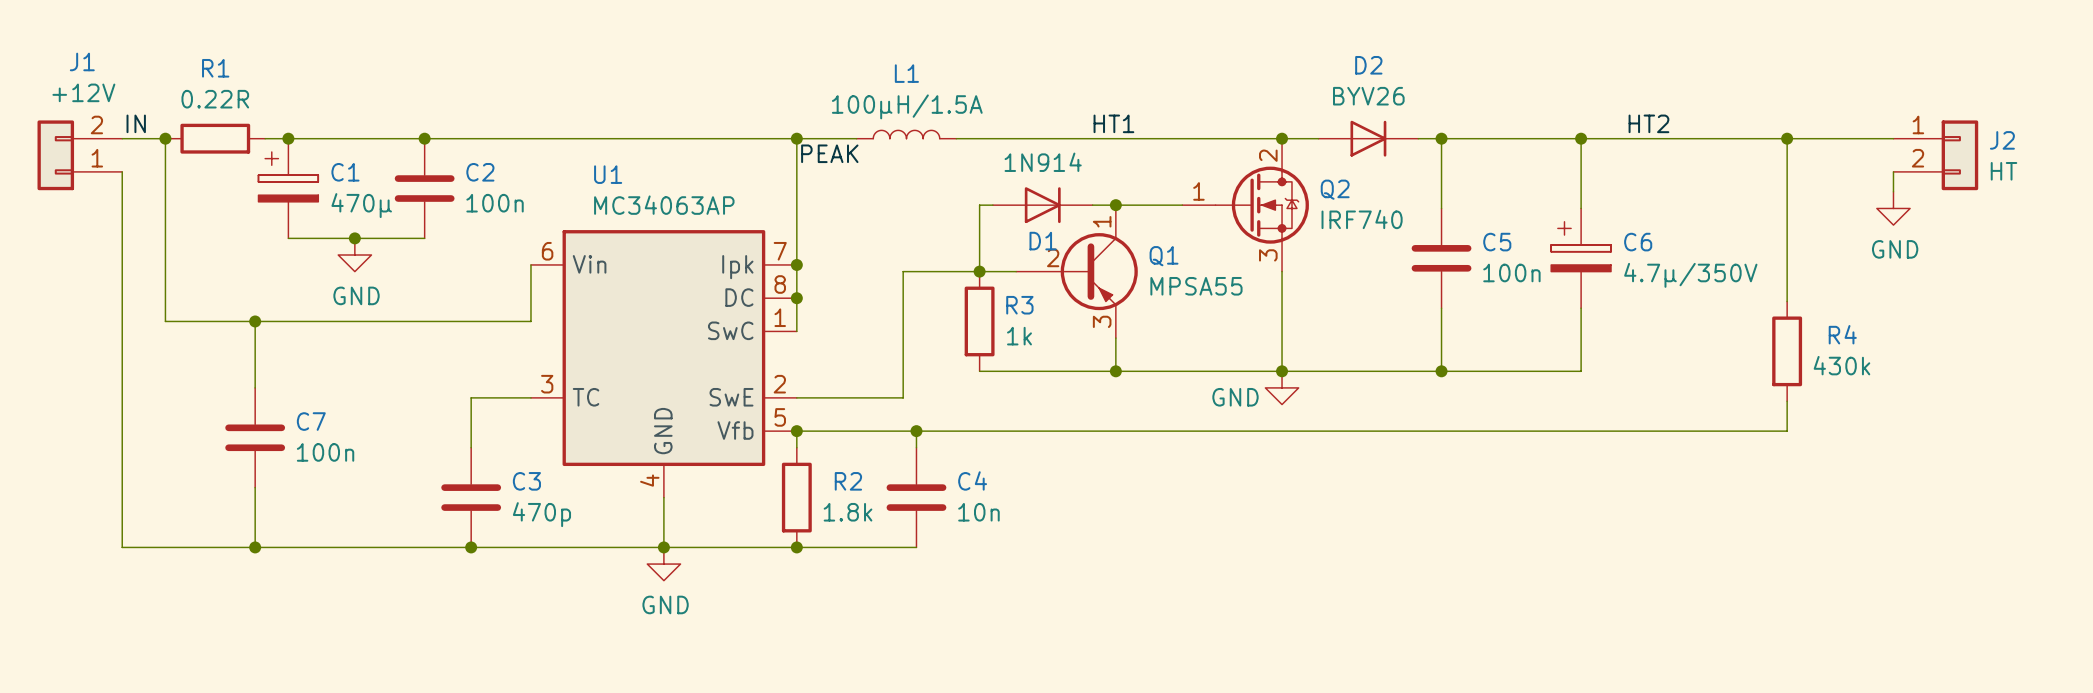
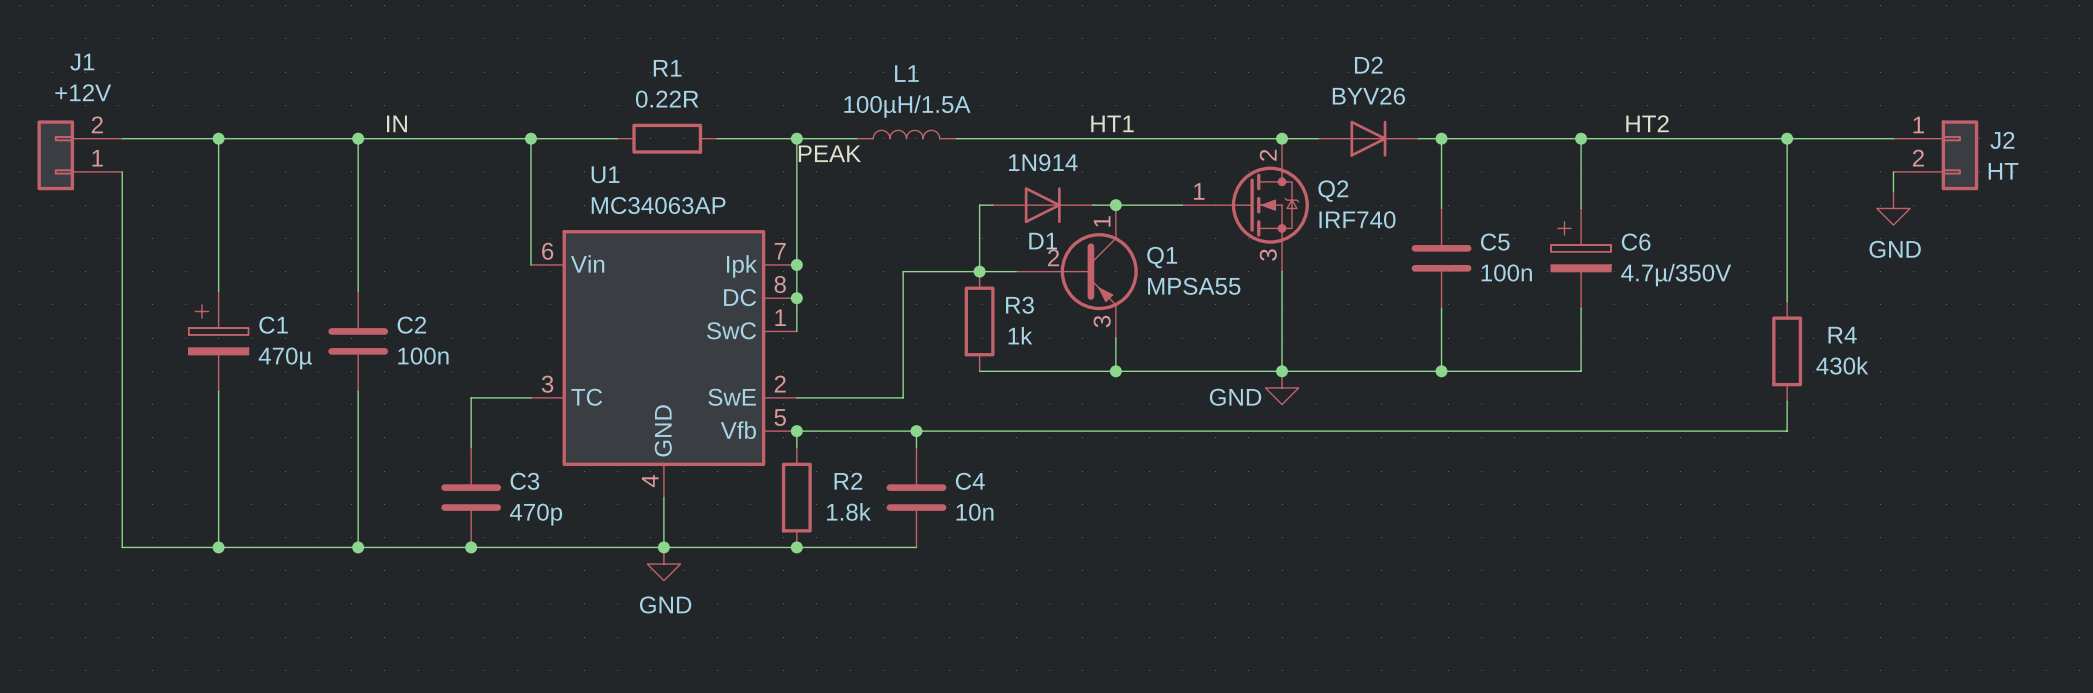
label position: IN (136, 123) -> IN (396, 123)
wire: (165, 138) (165, 321) (530, 321) (530, 264) -> (165, 138) (265, 138)
junction: (165, 138) -> none
R1 position: (215, 138) -> (667, 138)
wire: none -> (218, 138) (218, 291)
junction: none -> (218, 138)
junction: (288, 138) -> none
wire: none -> (358, 138) (358, 291)
junction: none -> (358, 138)
junction: (424, 138) -> none
wire: none -> (530, 138) (530, 264)
junction: none -> (530, 138)
wire: (617, 138) (717, 138) -> none
C1 position: (288, 188) -> (218, 341)
C2 position: (424, 188) -> (358, 341)
wire: (288, 238) (424, 238) -> none
junction: (354, 238) -> none
power symbol: GND (354, 255) -> none
wire: (255, 321) (255, 387) -> none
junction: (255, 321) -> none
wire: none -> (218, 391) (218, 547)
wire: none -> (358, 391) (358, 547)
C7: 100n (255, 437) -> none
wire: (255, 487) (255, 547) -> none
junction position: (255, 547) -> (218, 547)
junction: none -> (358, 547)

